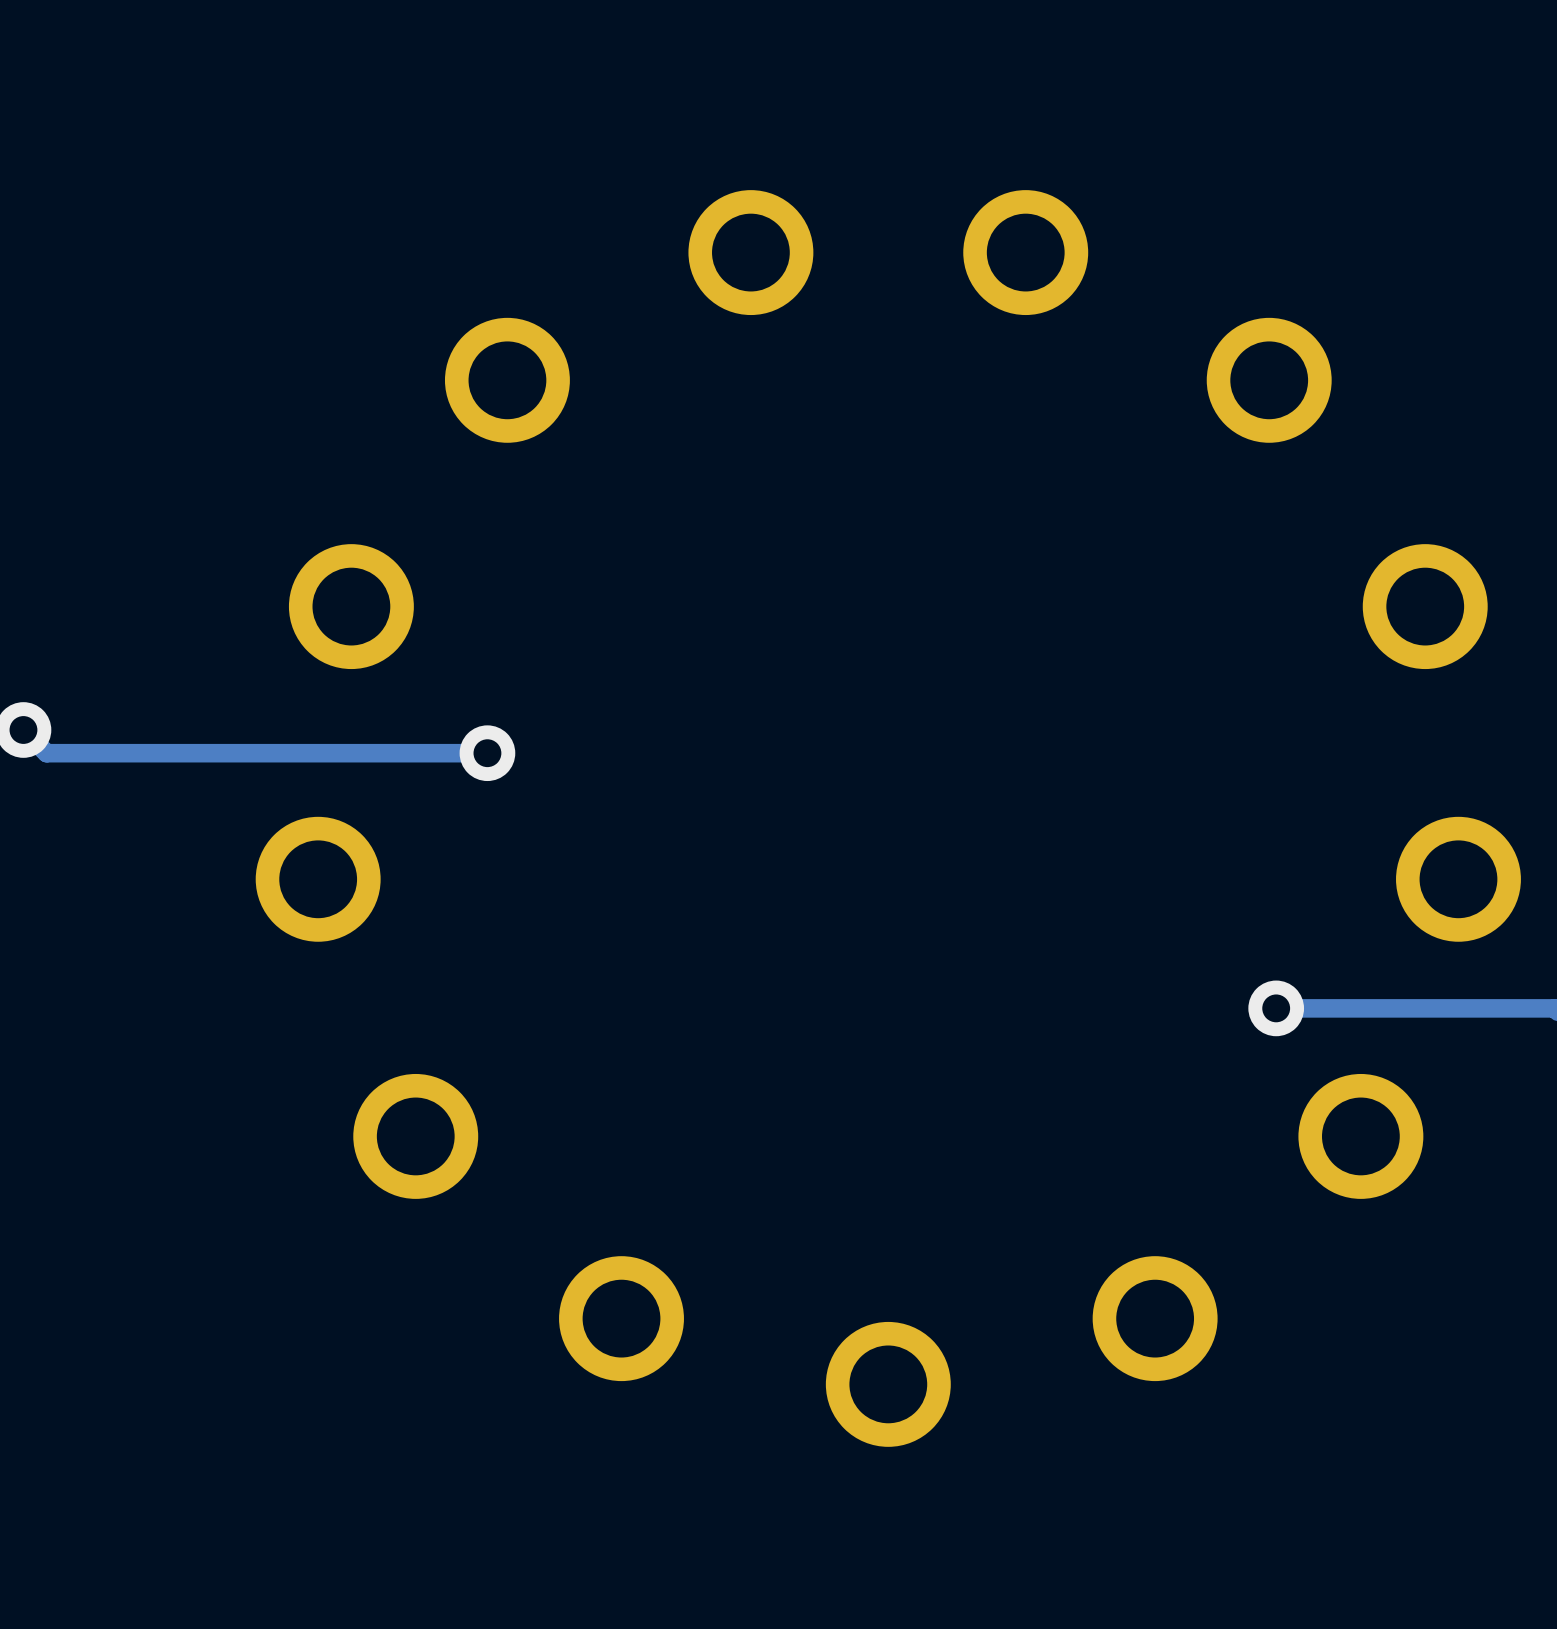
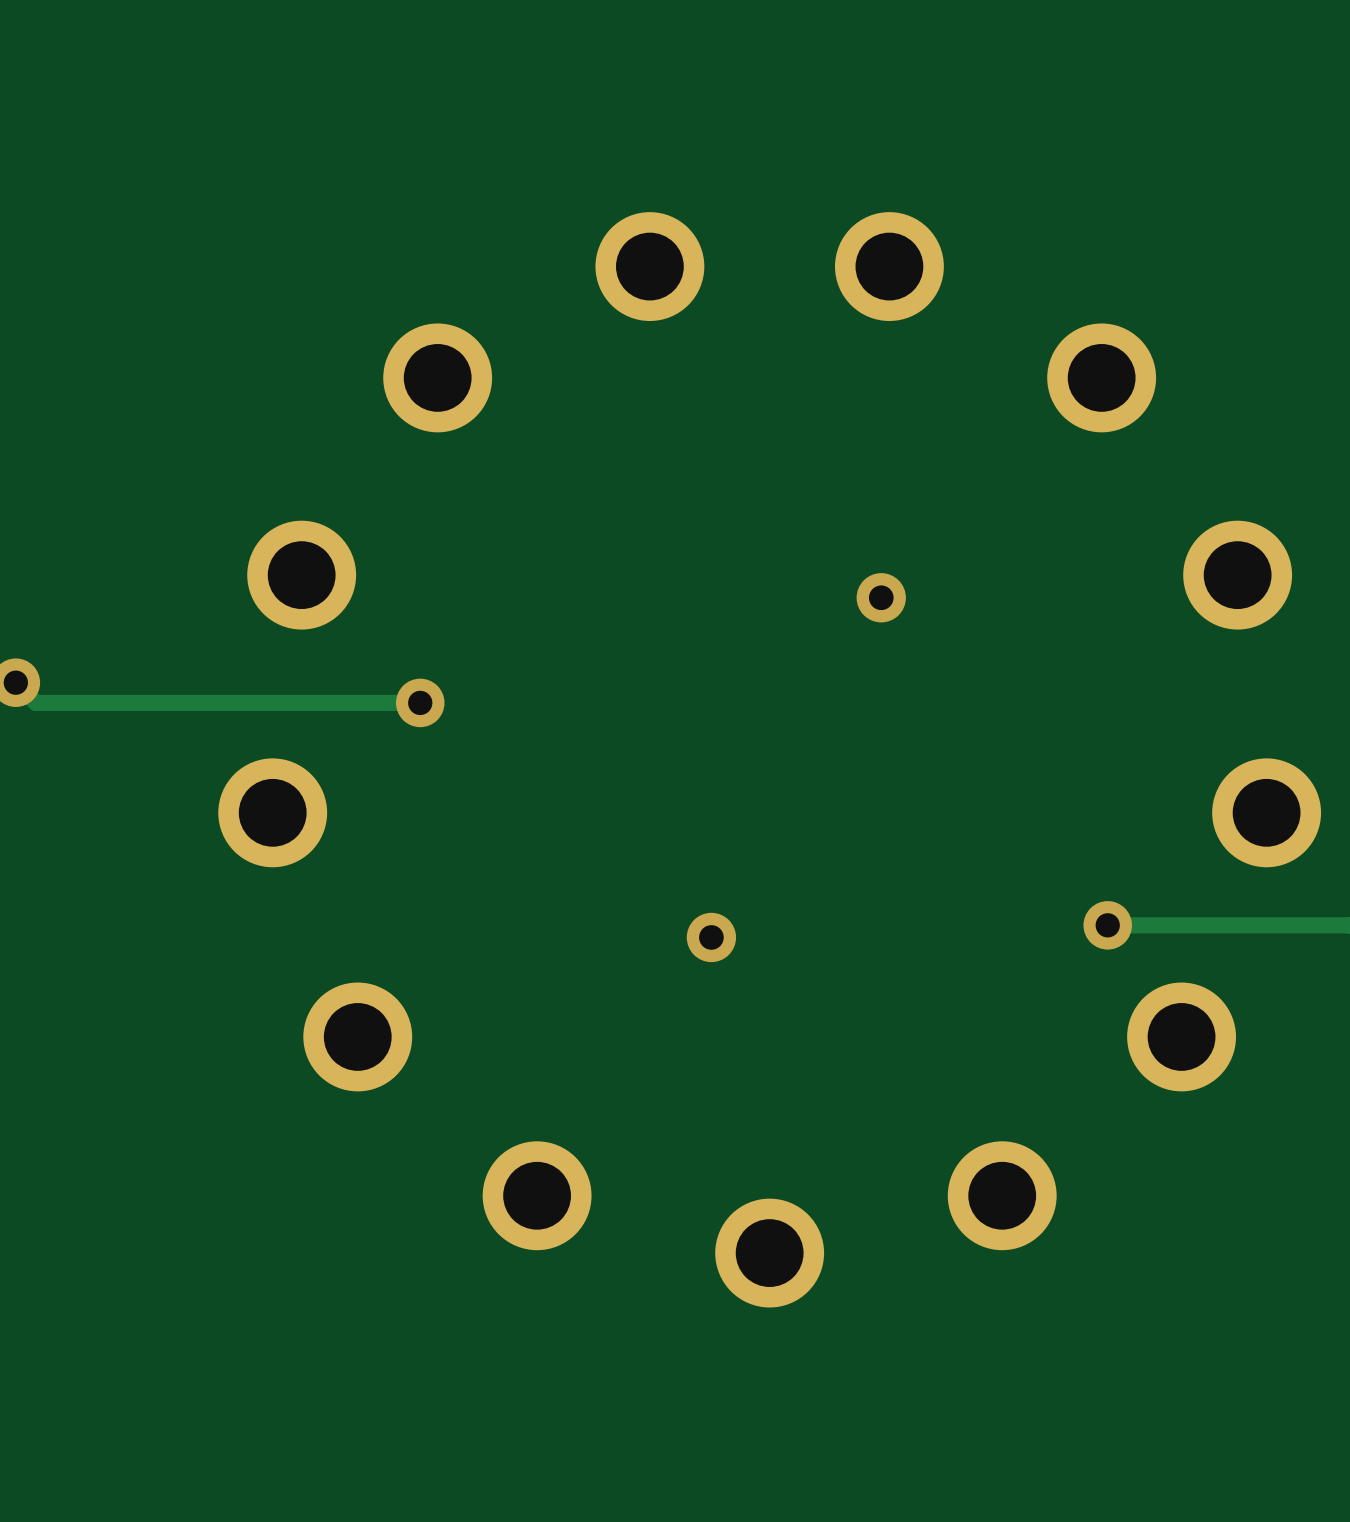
via: none -> (881, 597)
via: none -> (711, 937)

